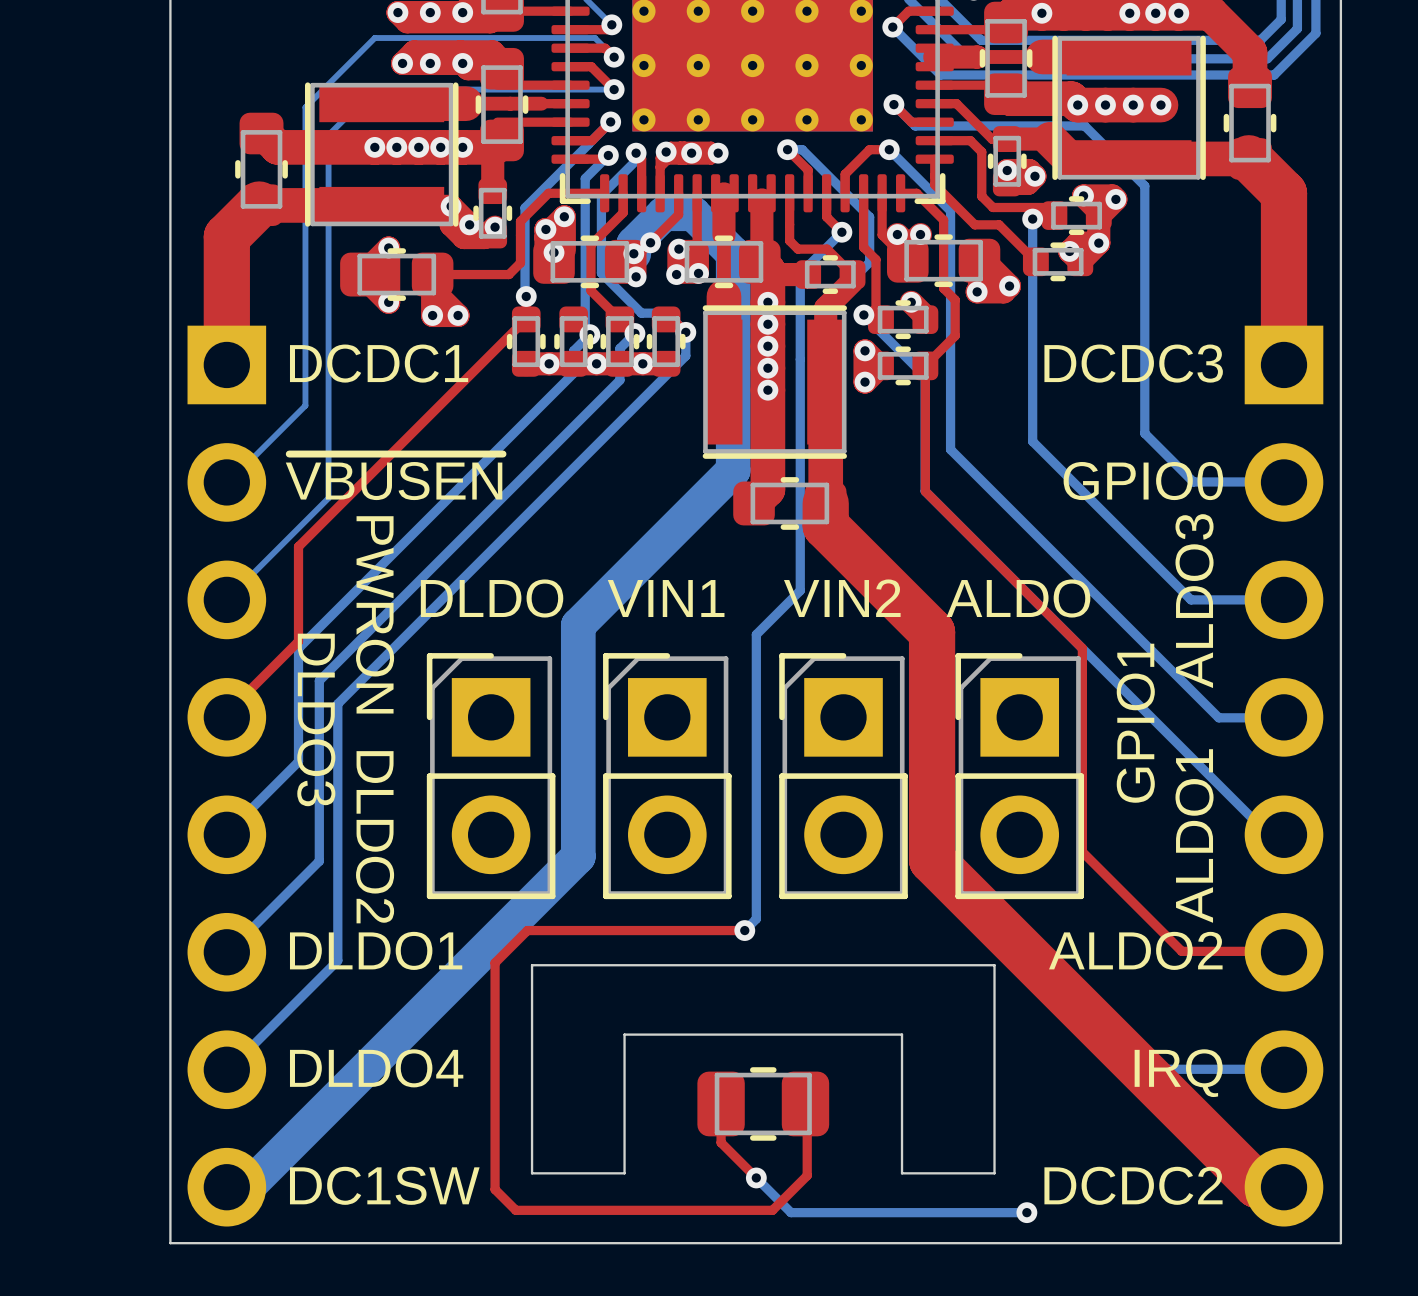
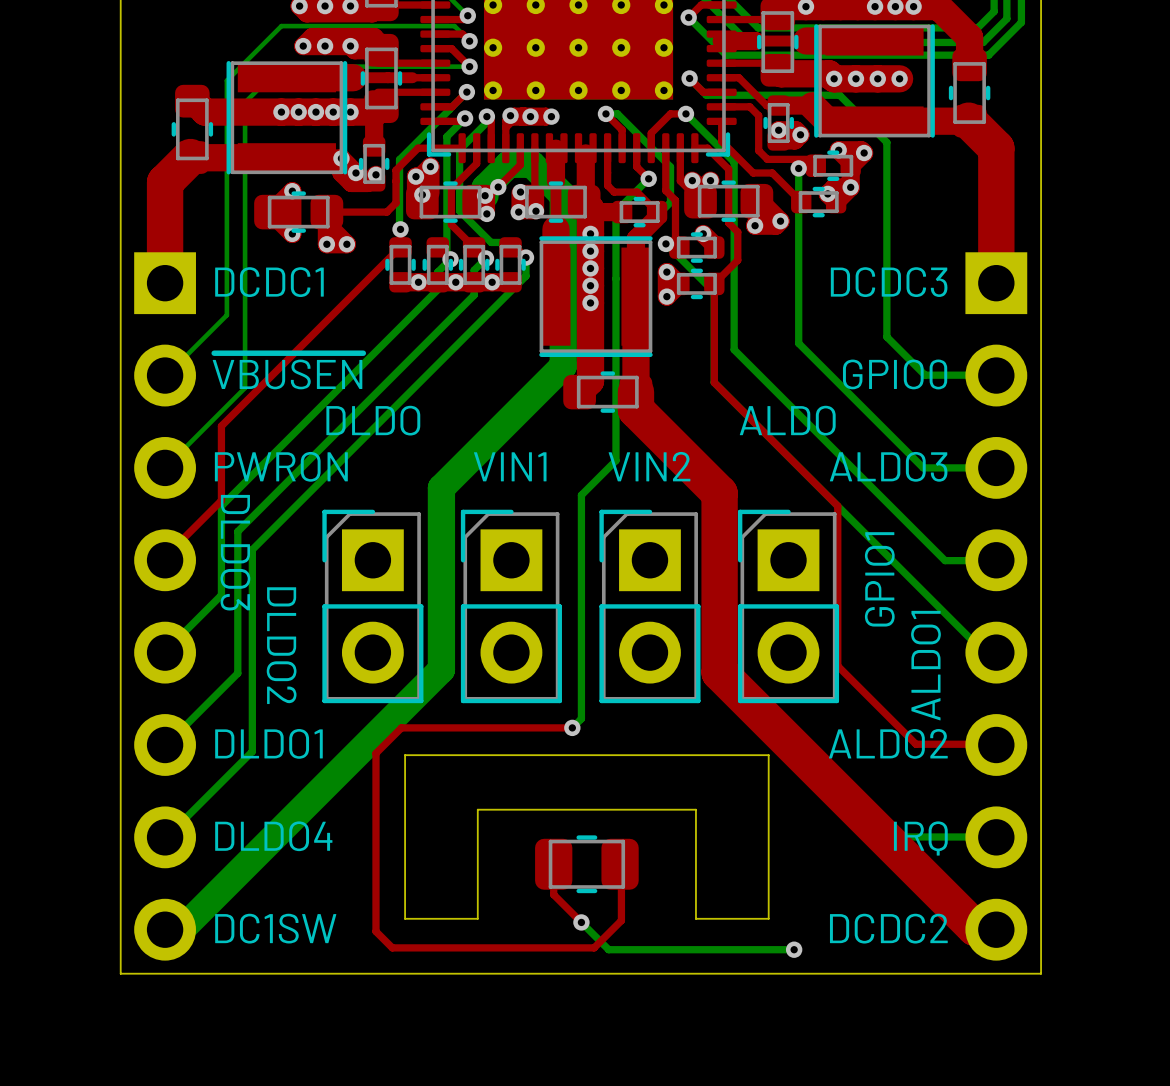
text position: DLDO (492, 598) -> DLDO (373, 420)
text position: ALDO (1018, 598) -> ALDO (787, 420)
text rotation: 0° (1194, 601) -> 90° clockwise (888, 466)
text rotation: 0° (375, 614) -> 90° counterclockwise (281, 466)

